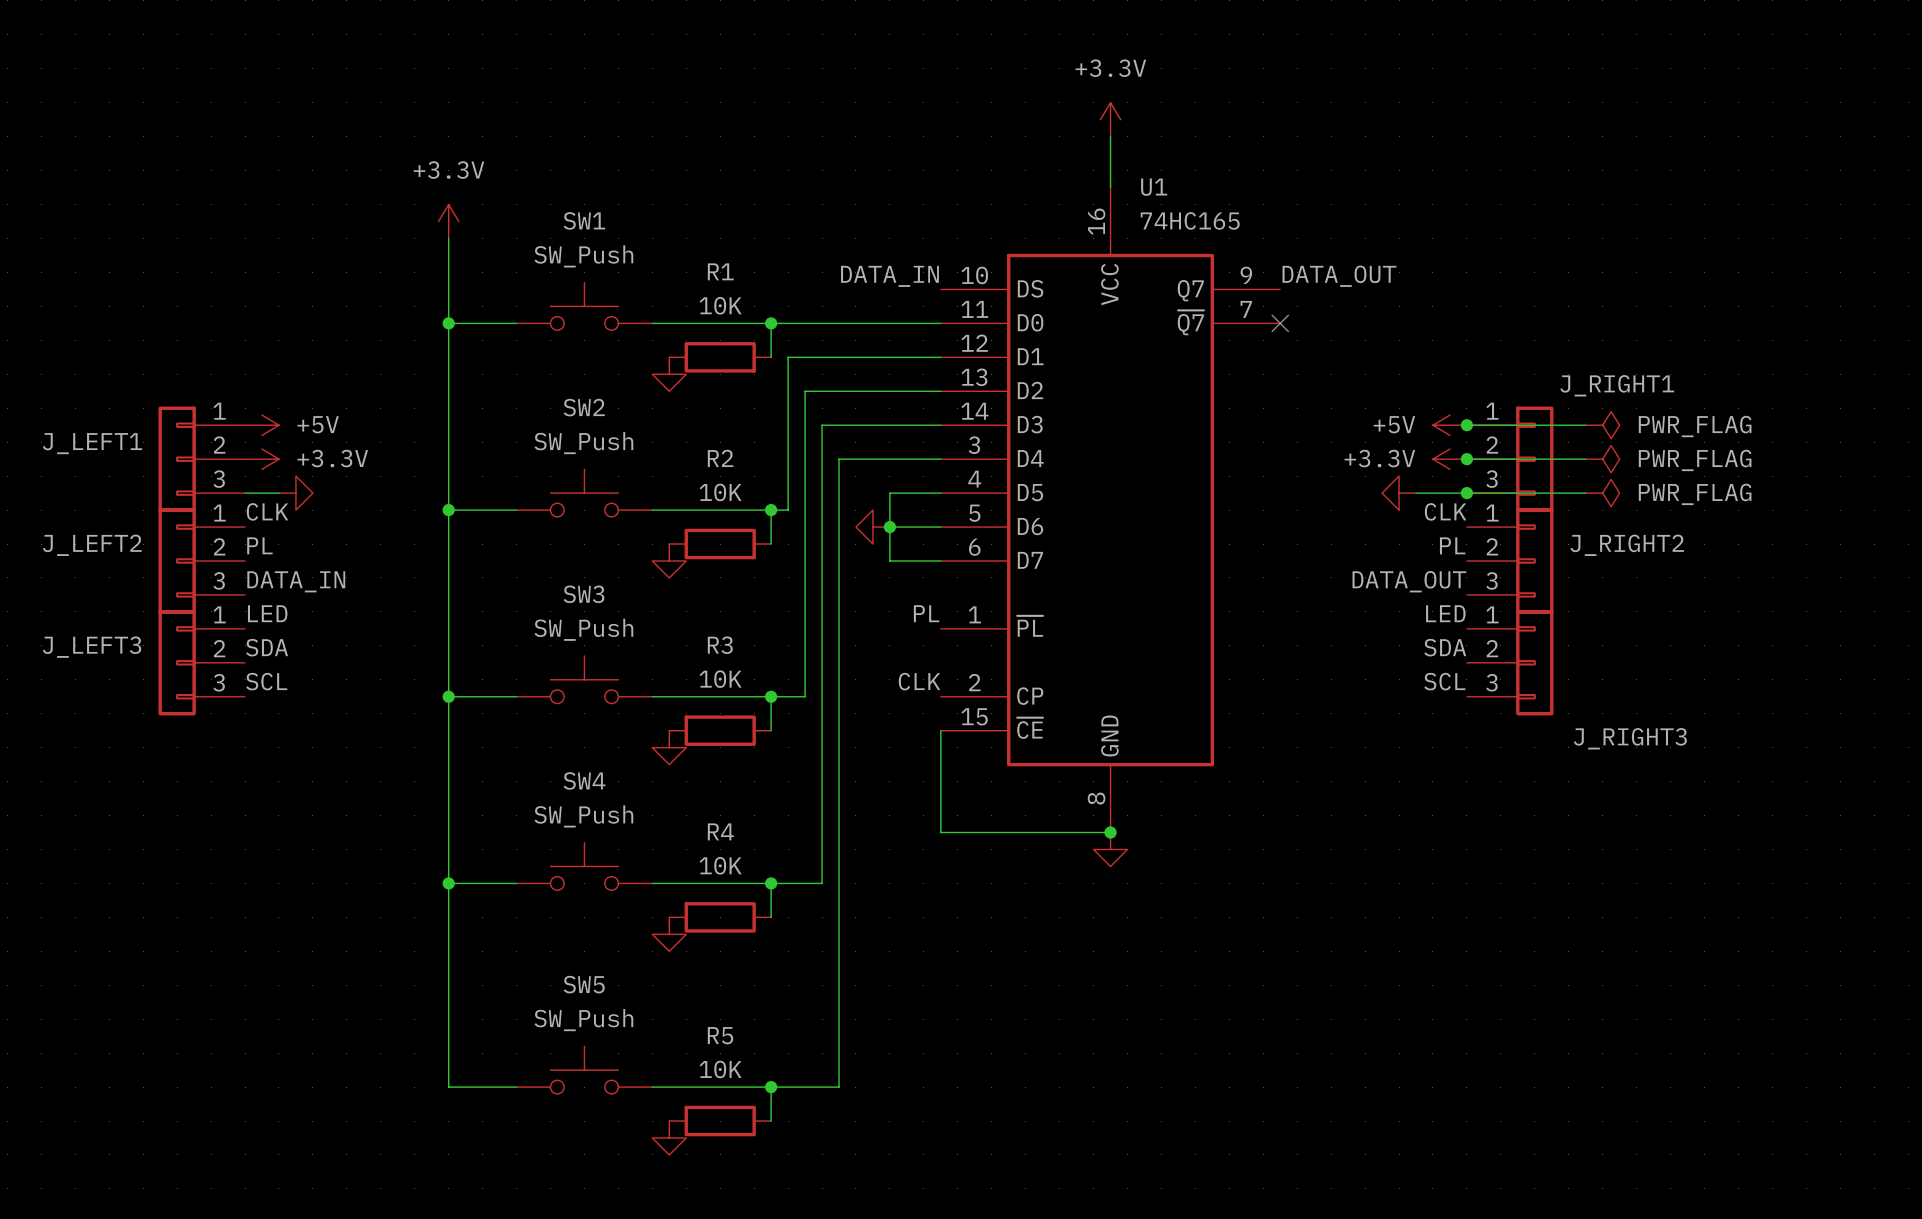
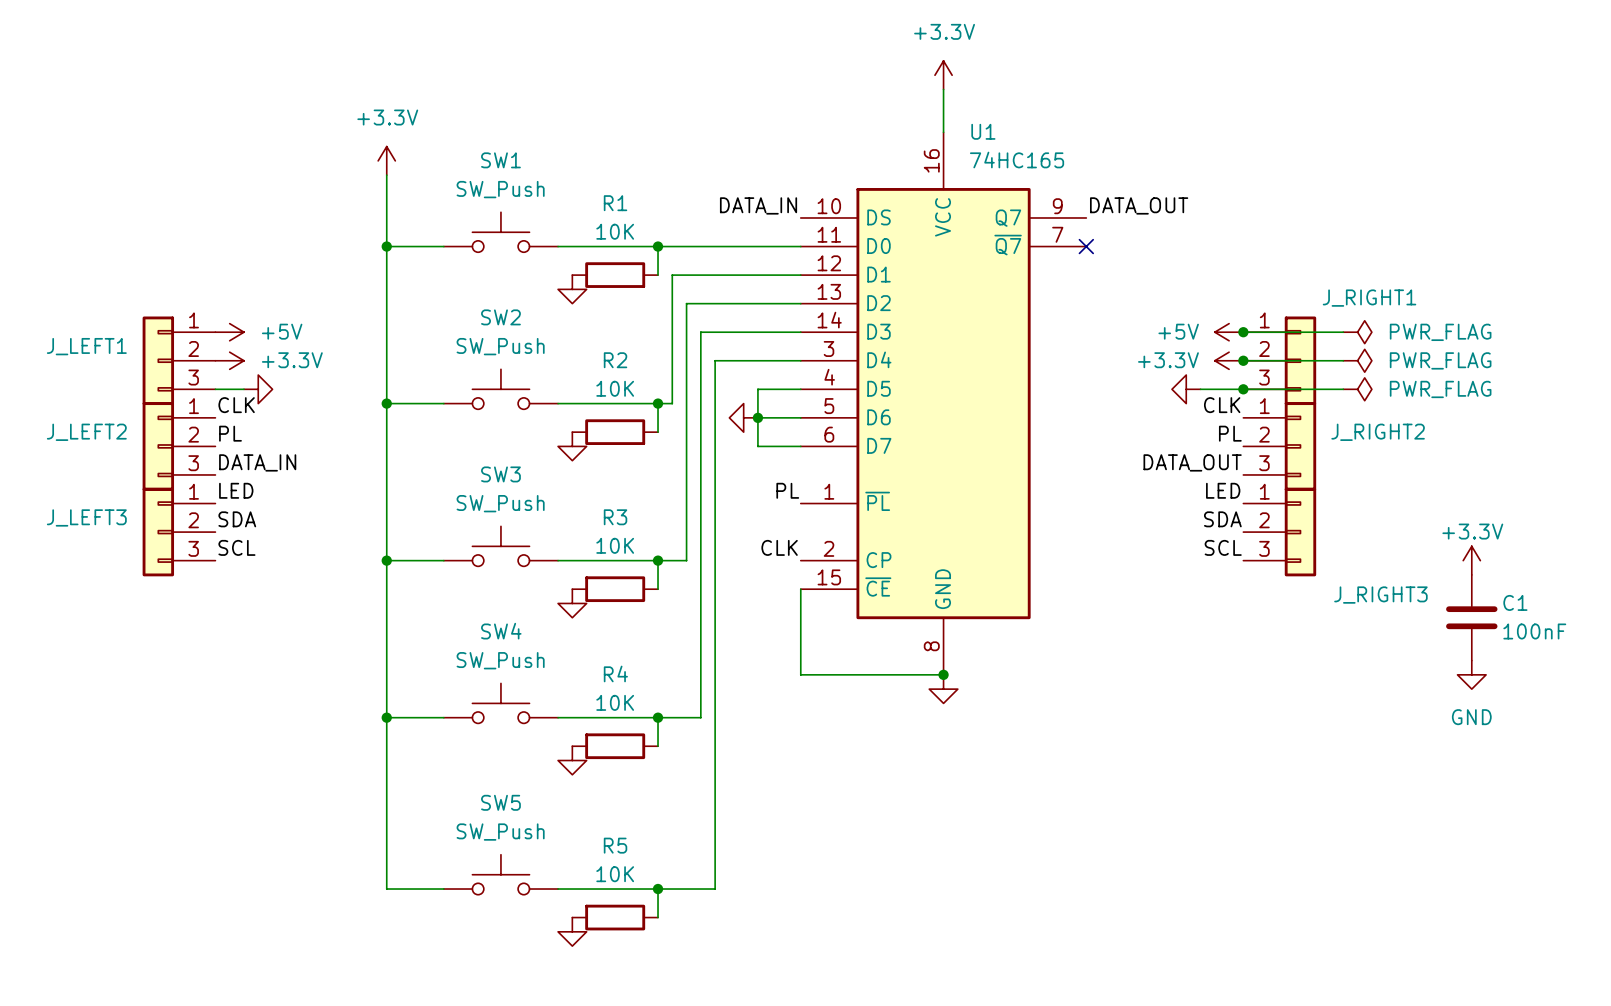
power symbol: none -> +3.3V (1471, 560)
C1: none -> 100nF (1471, 617)
power symbol: none -> GND (1471, 674)

